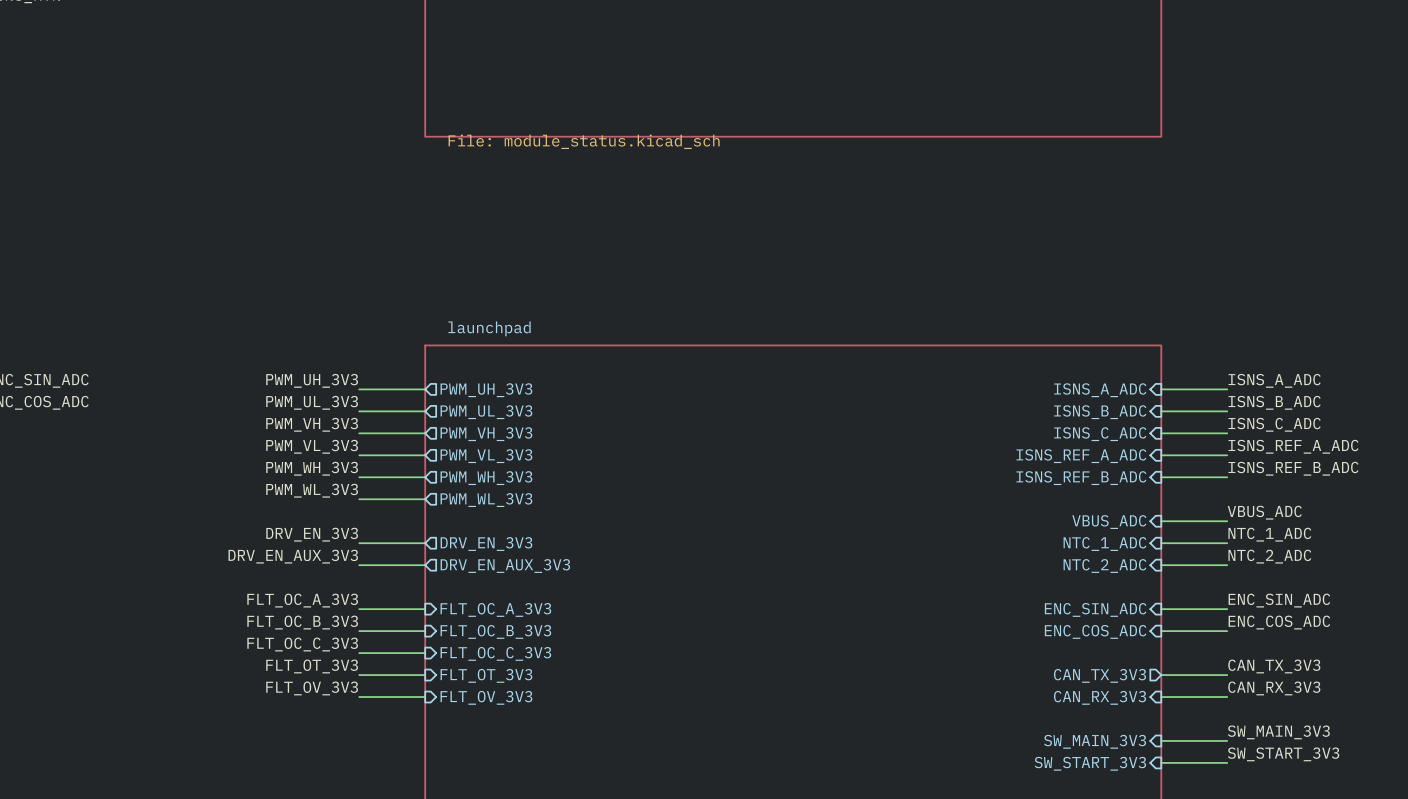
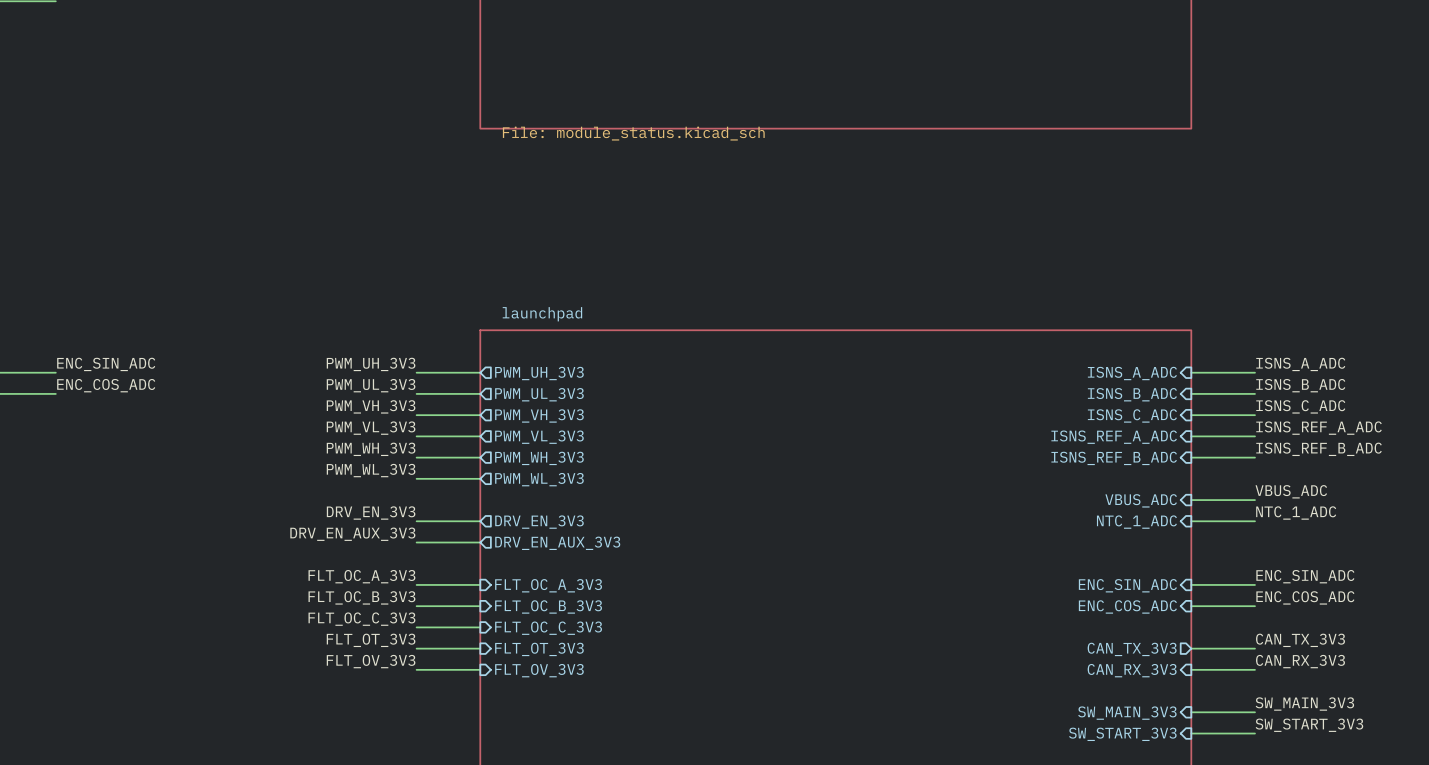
label: NTC_2_ADC (1269, 556) -> none
wire: (1161, 565) (1227, 565) -> none
sheet pin: NTC_2_ADC (1104, 566) -> none

